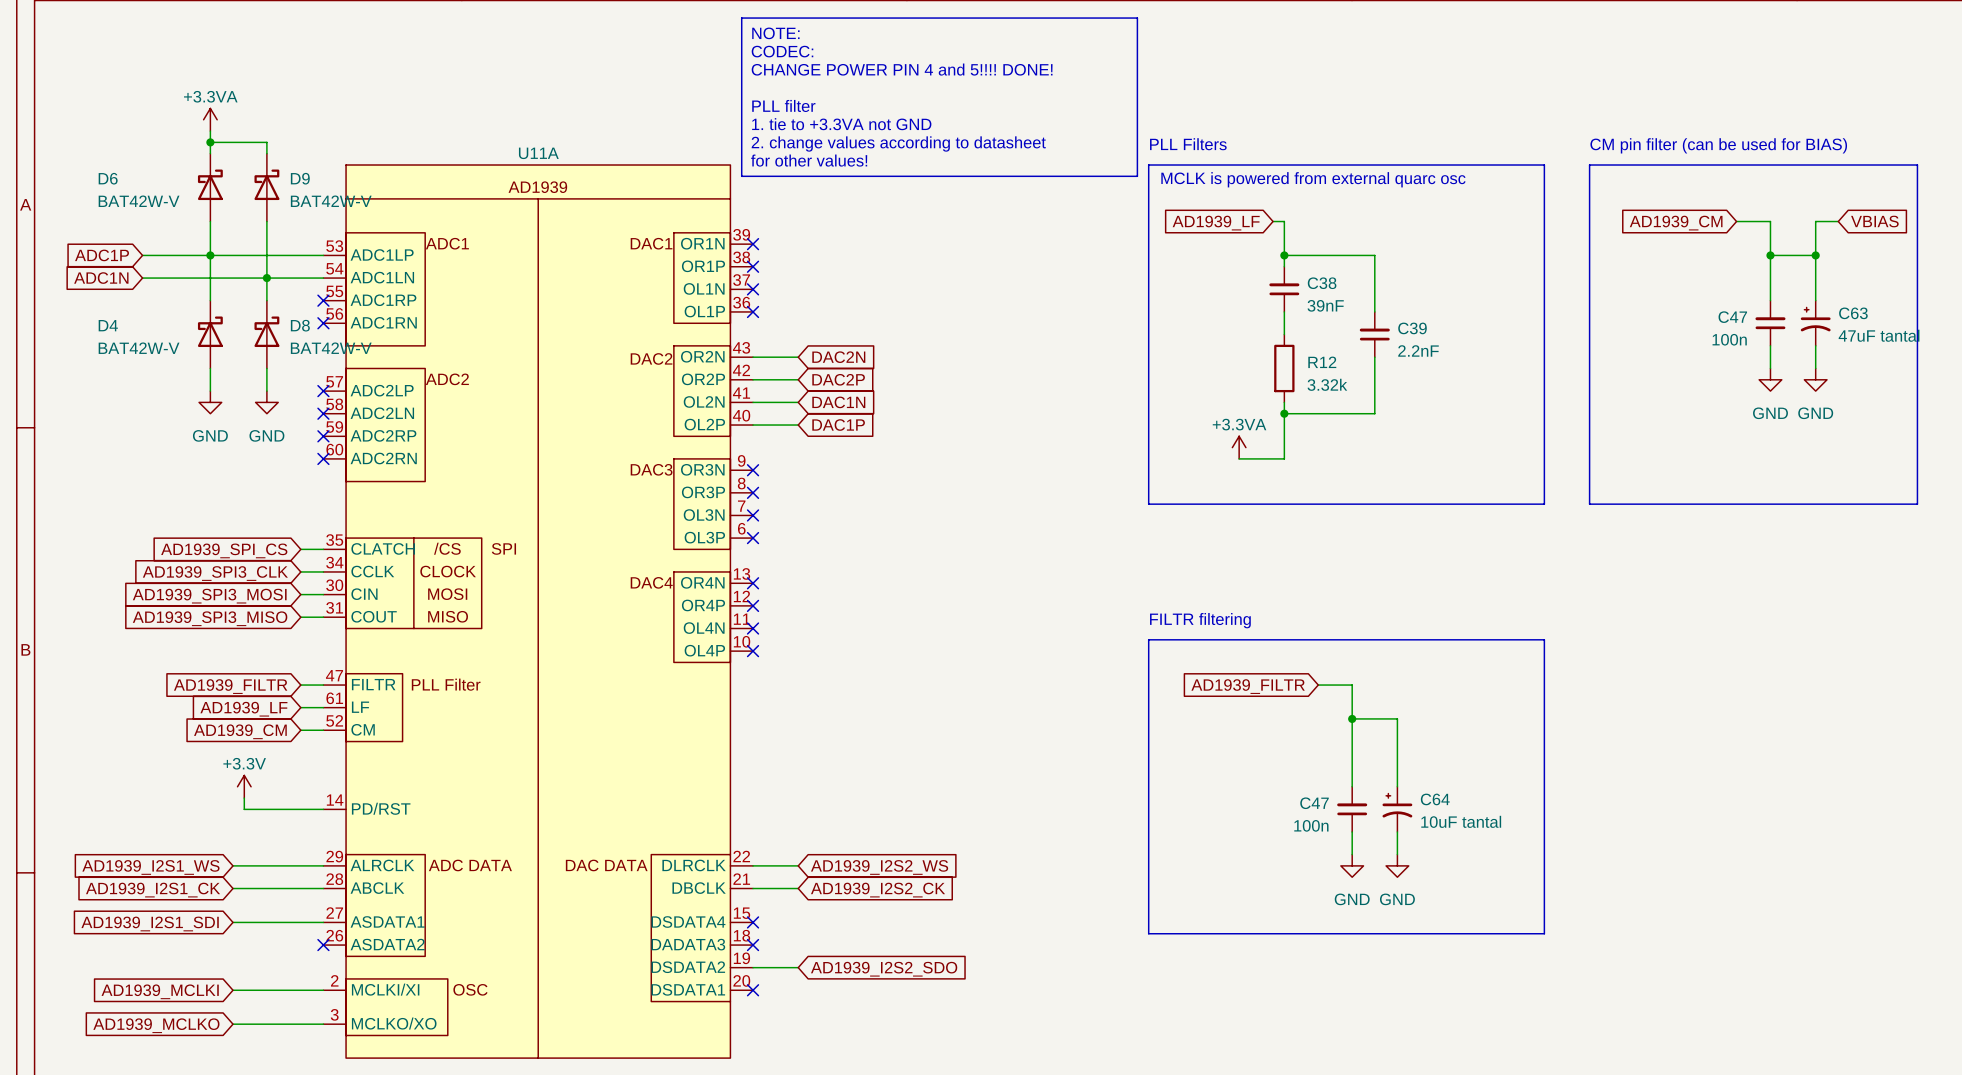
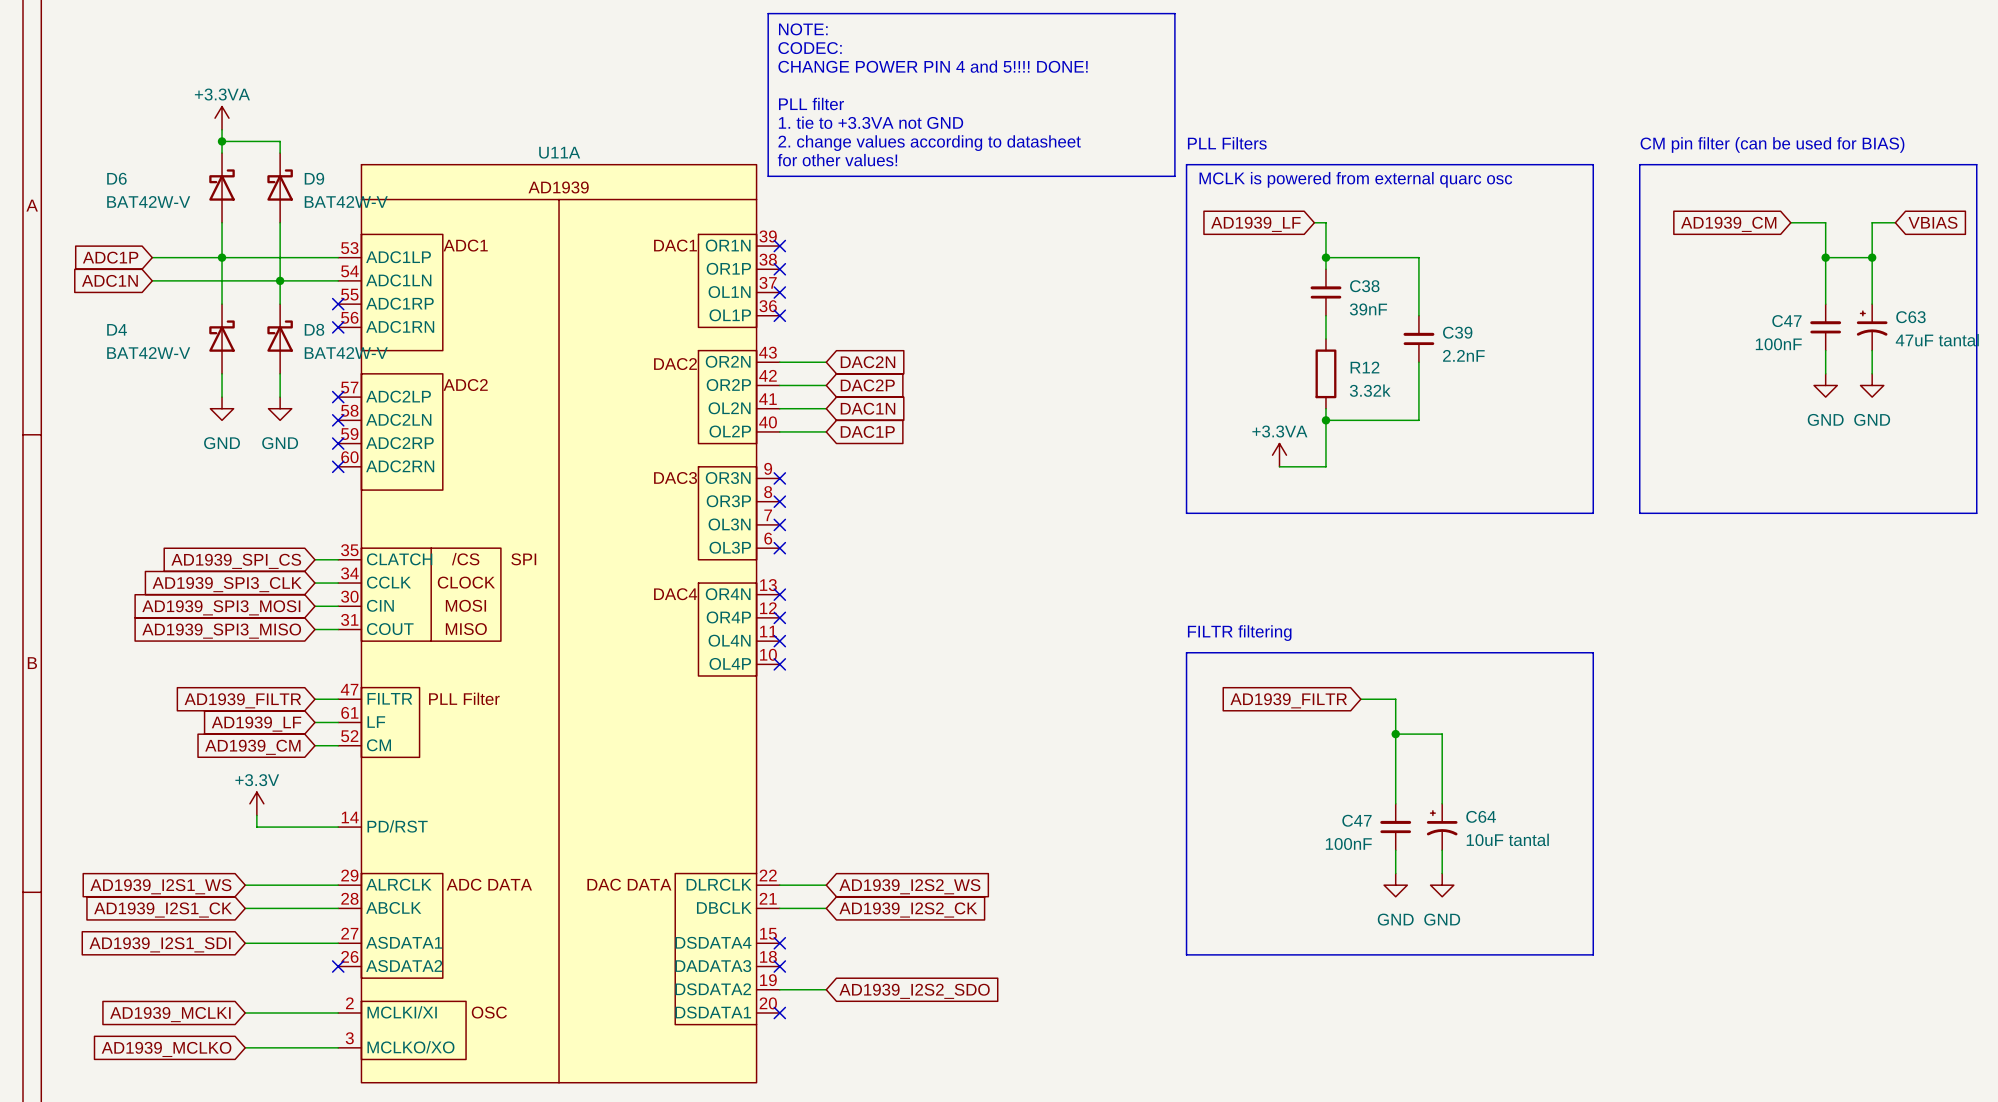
C47 value: 100n (1729, 339) -> 100nF (1778, 344)
C47 value: 100n (1311, 825) -> 100nF (1348, 844)

